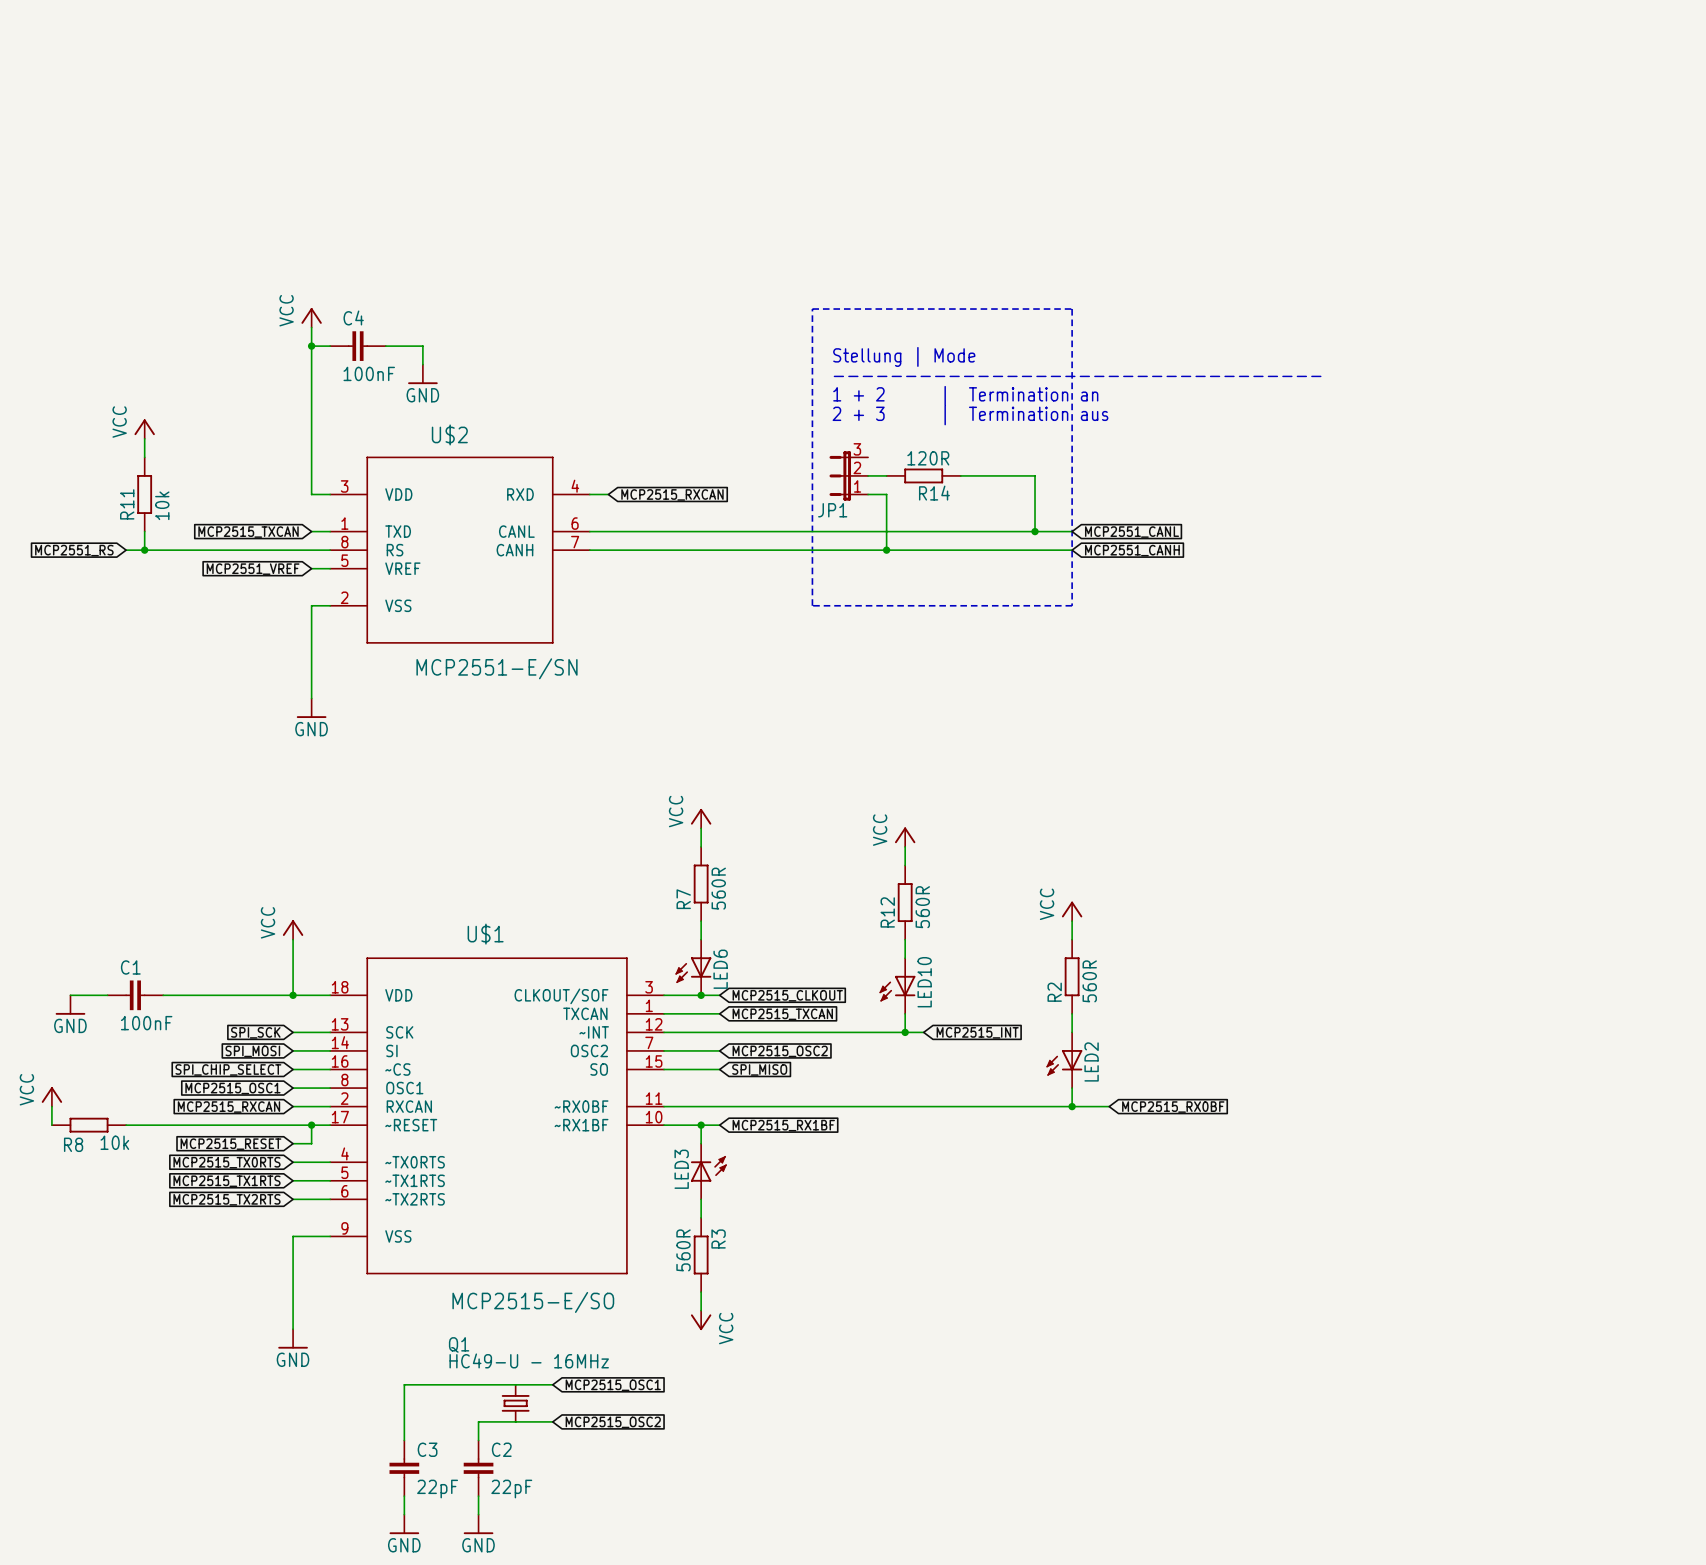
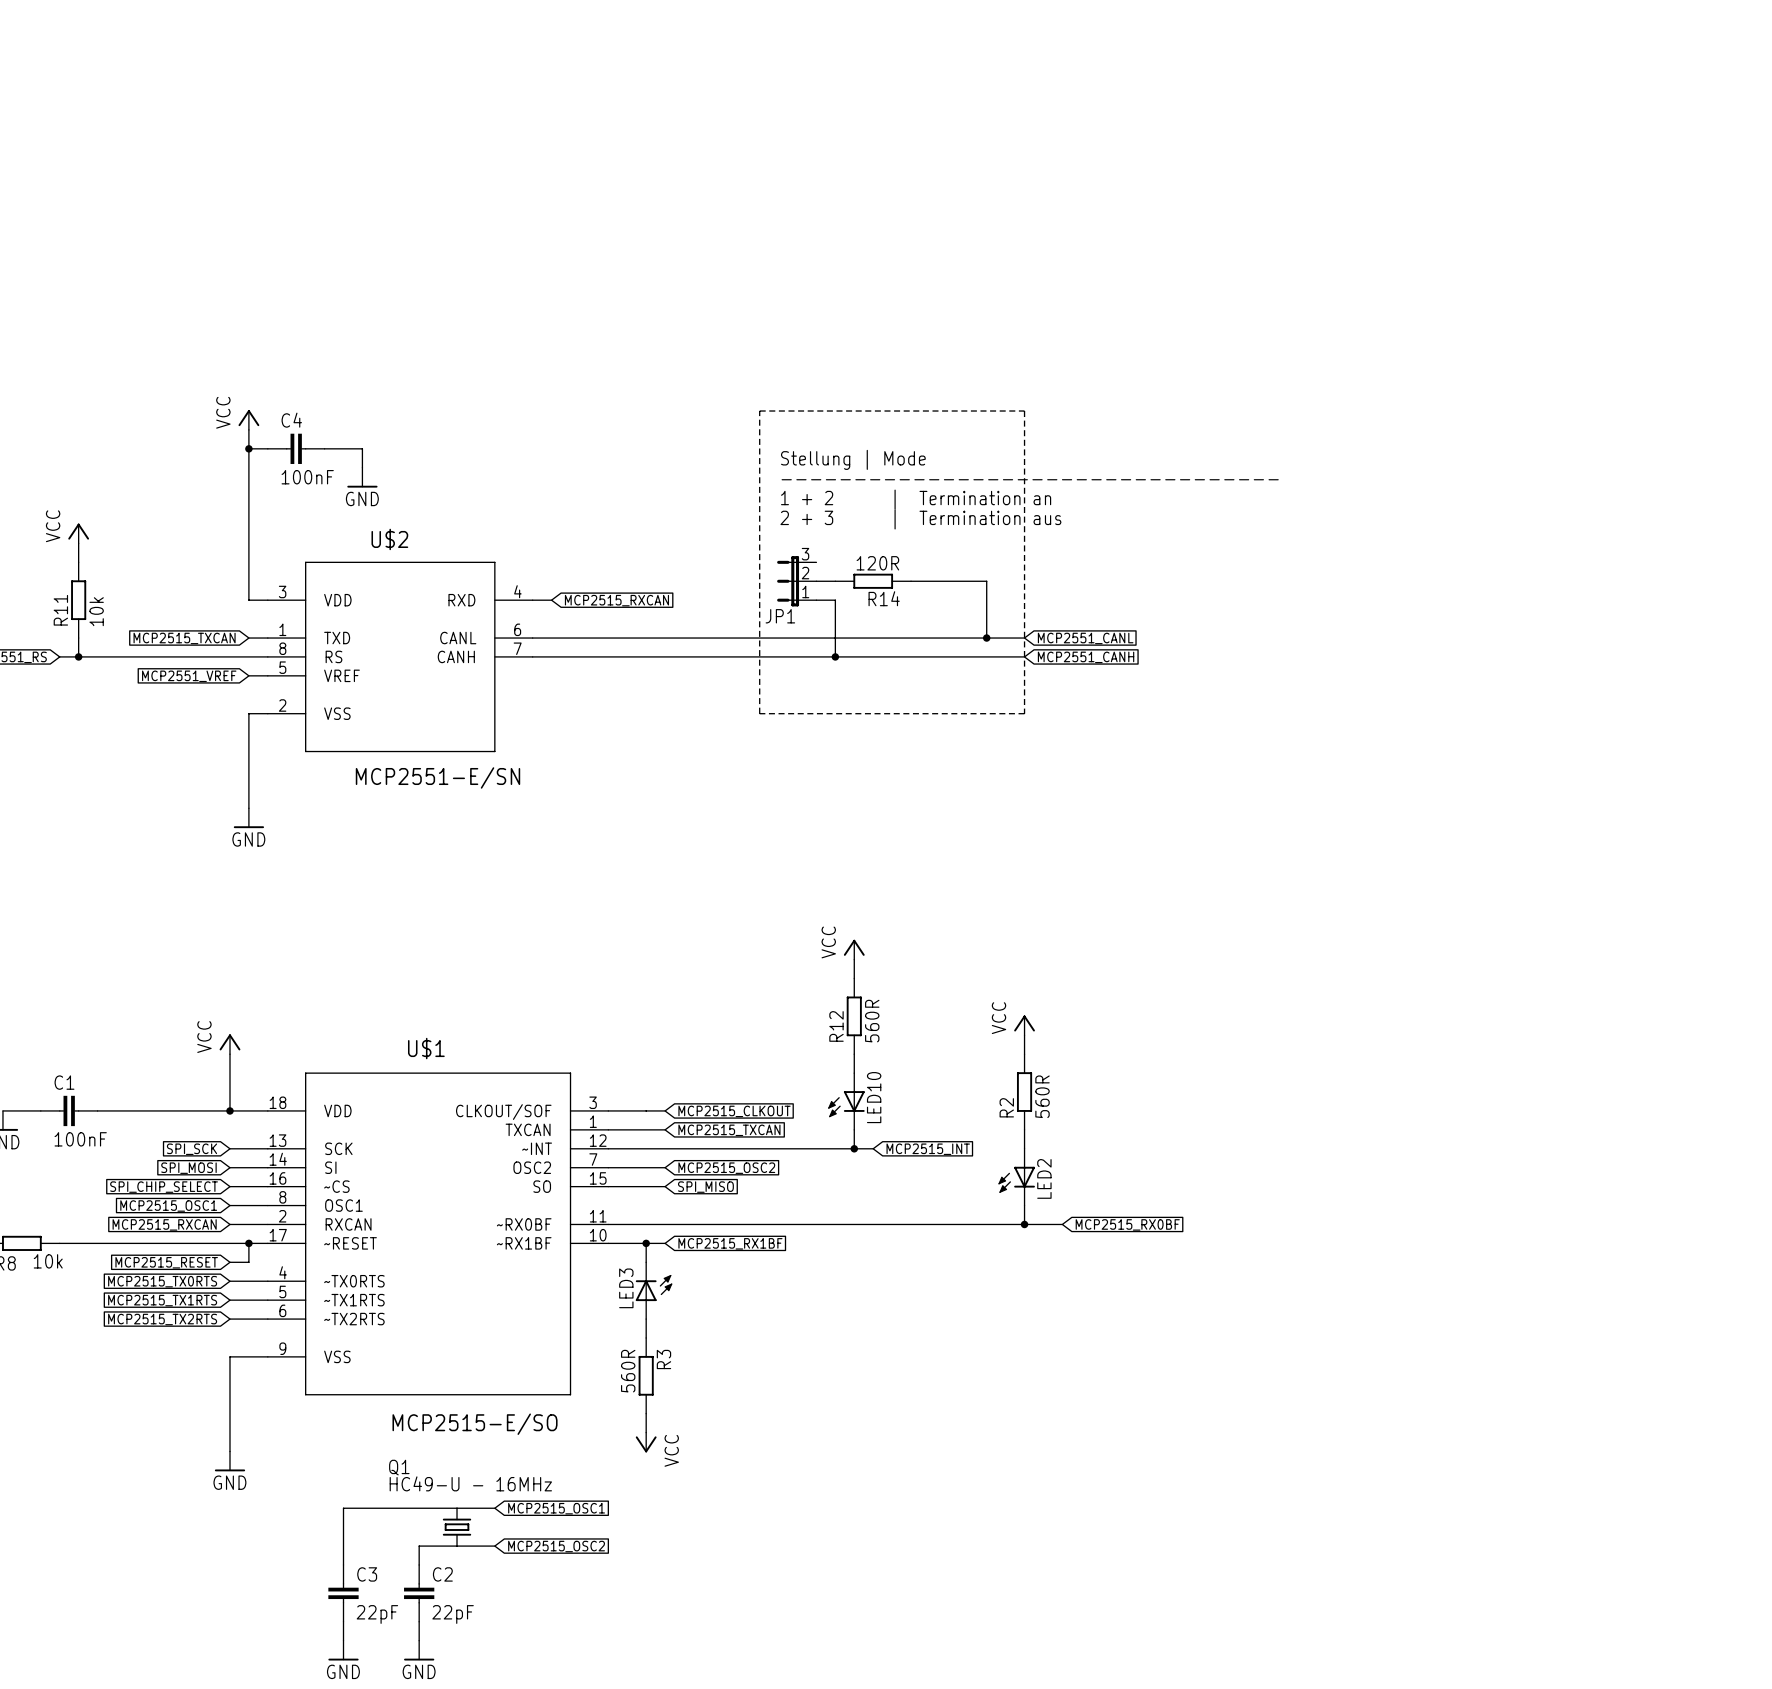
power symbol: VCC (701, 818) -> none
wire: (701, 828) (701, 846) -> none
R7: 560R (701, 884) -> none
wire: (701, 921) (701, 939) -> none
LED6: (693, 967) -> none
junction: (701, 995) -> none

